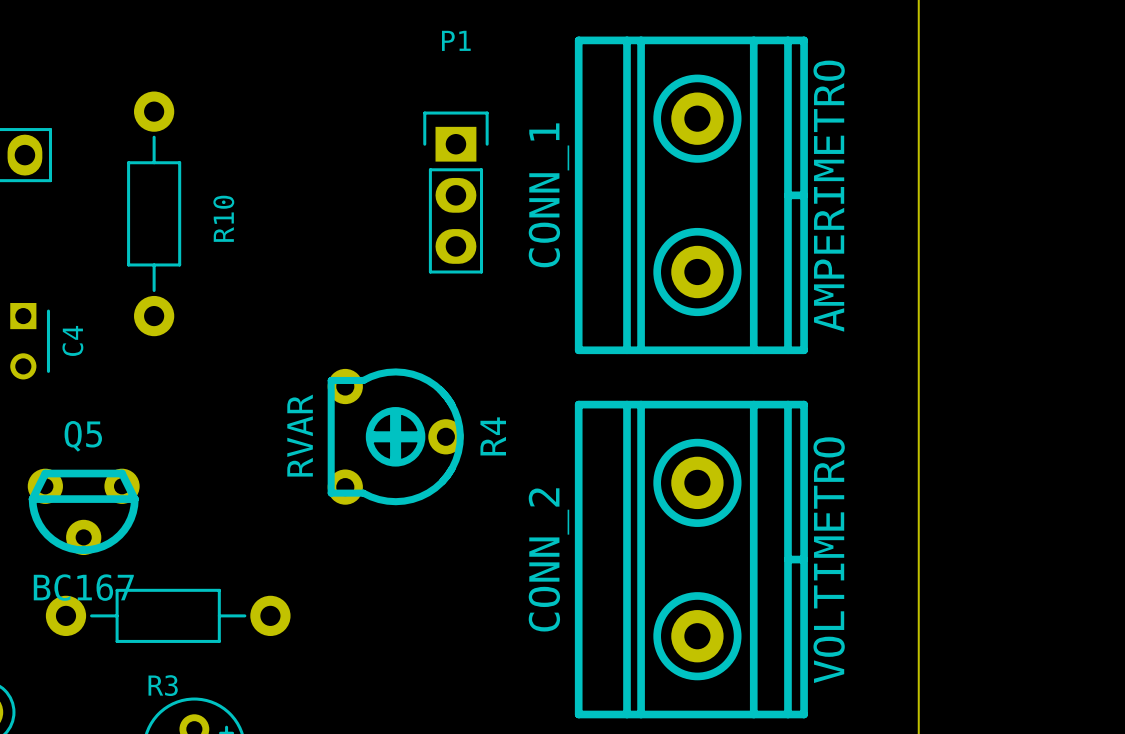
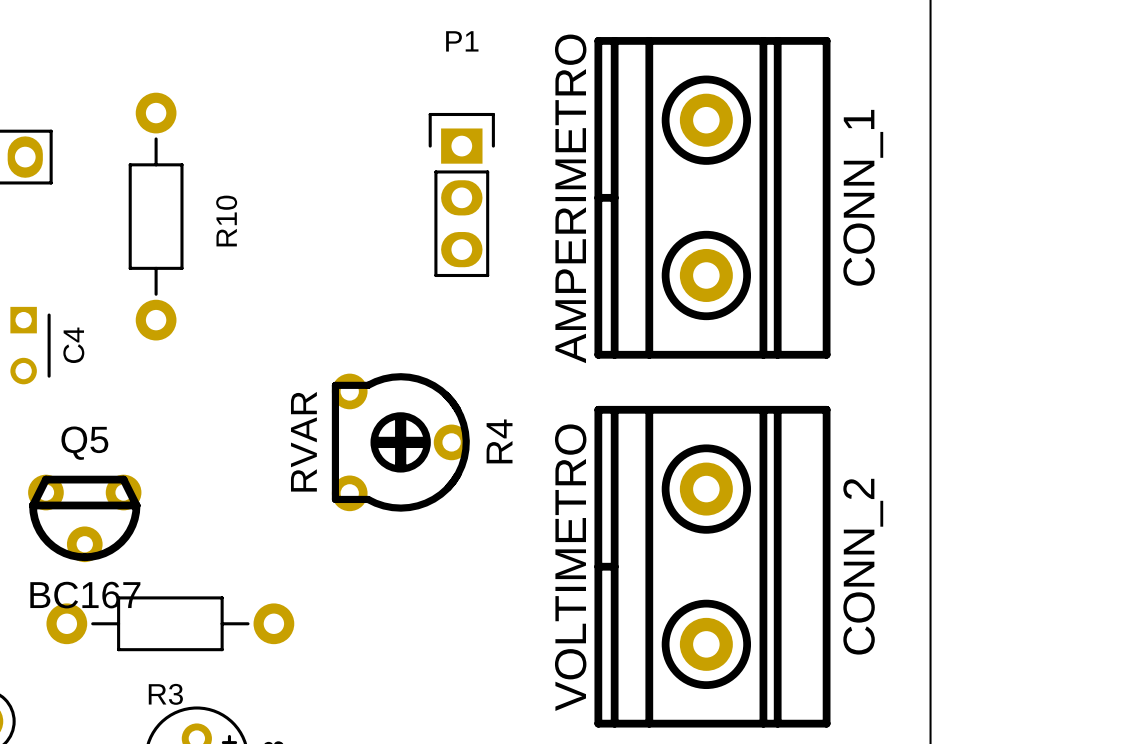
CONN_1 rotation: 0° (691, 195) -> 180° (712, 197)
CONN_2 rotation: 0° (691, 559) -> 180° (712, 566)

